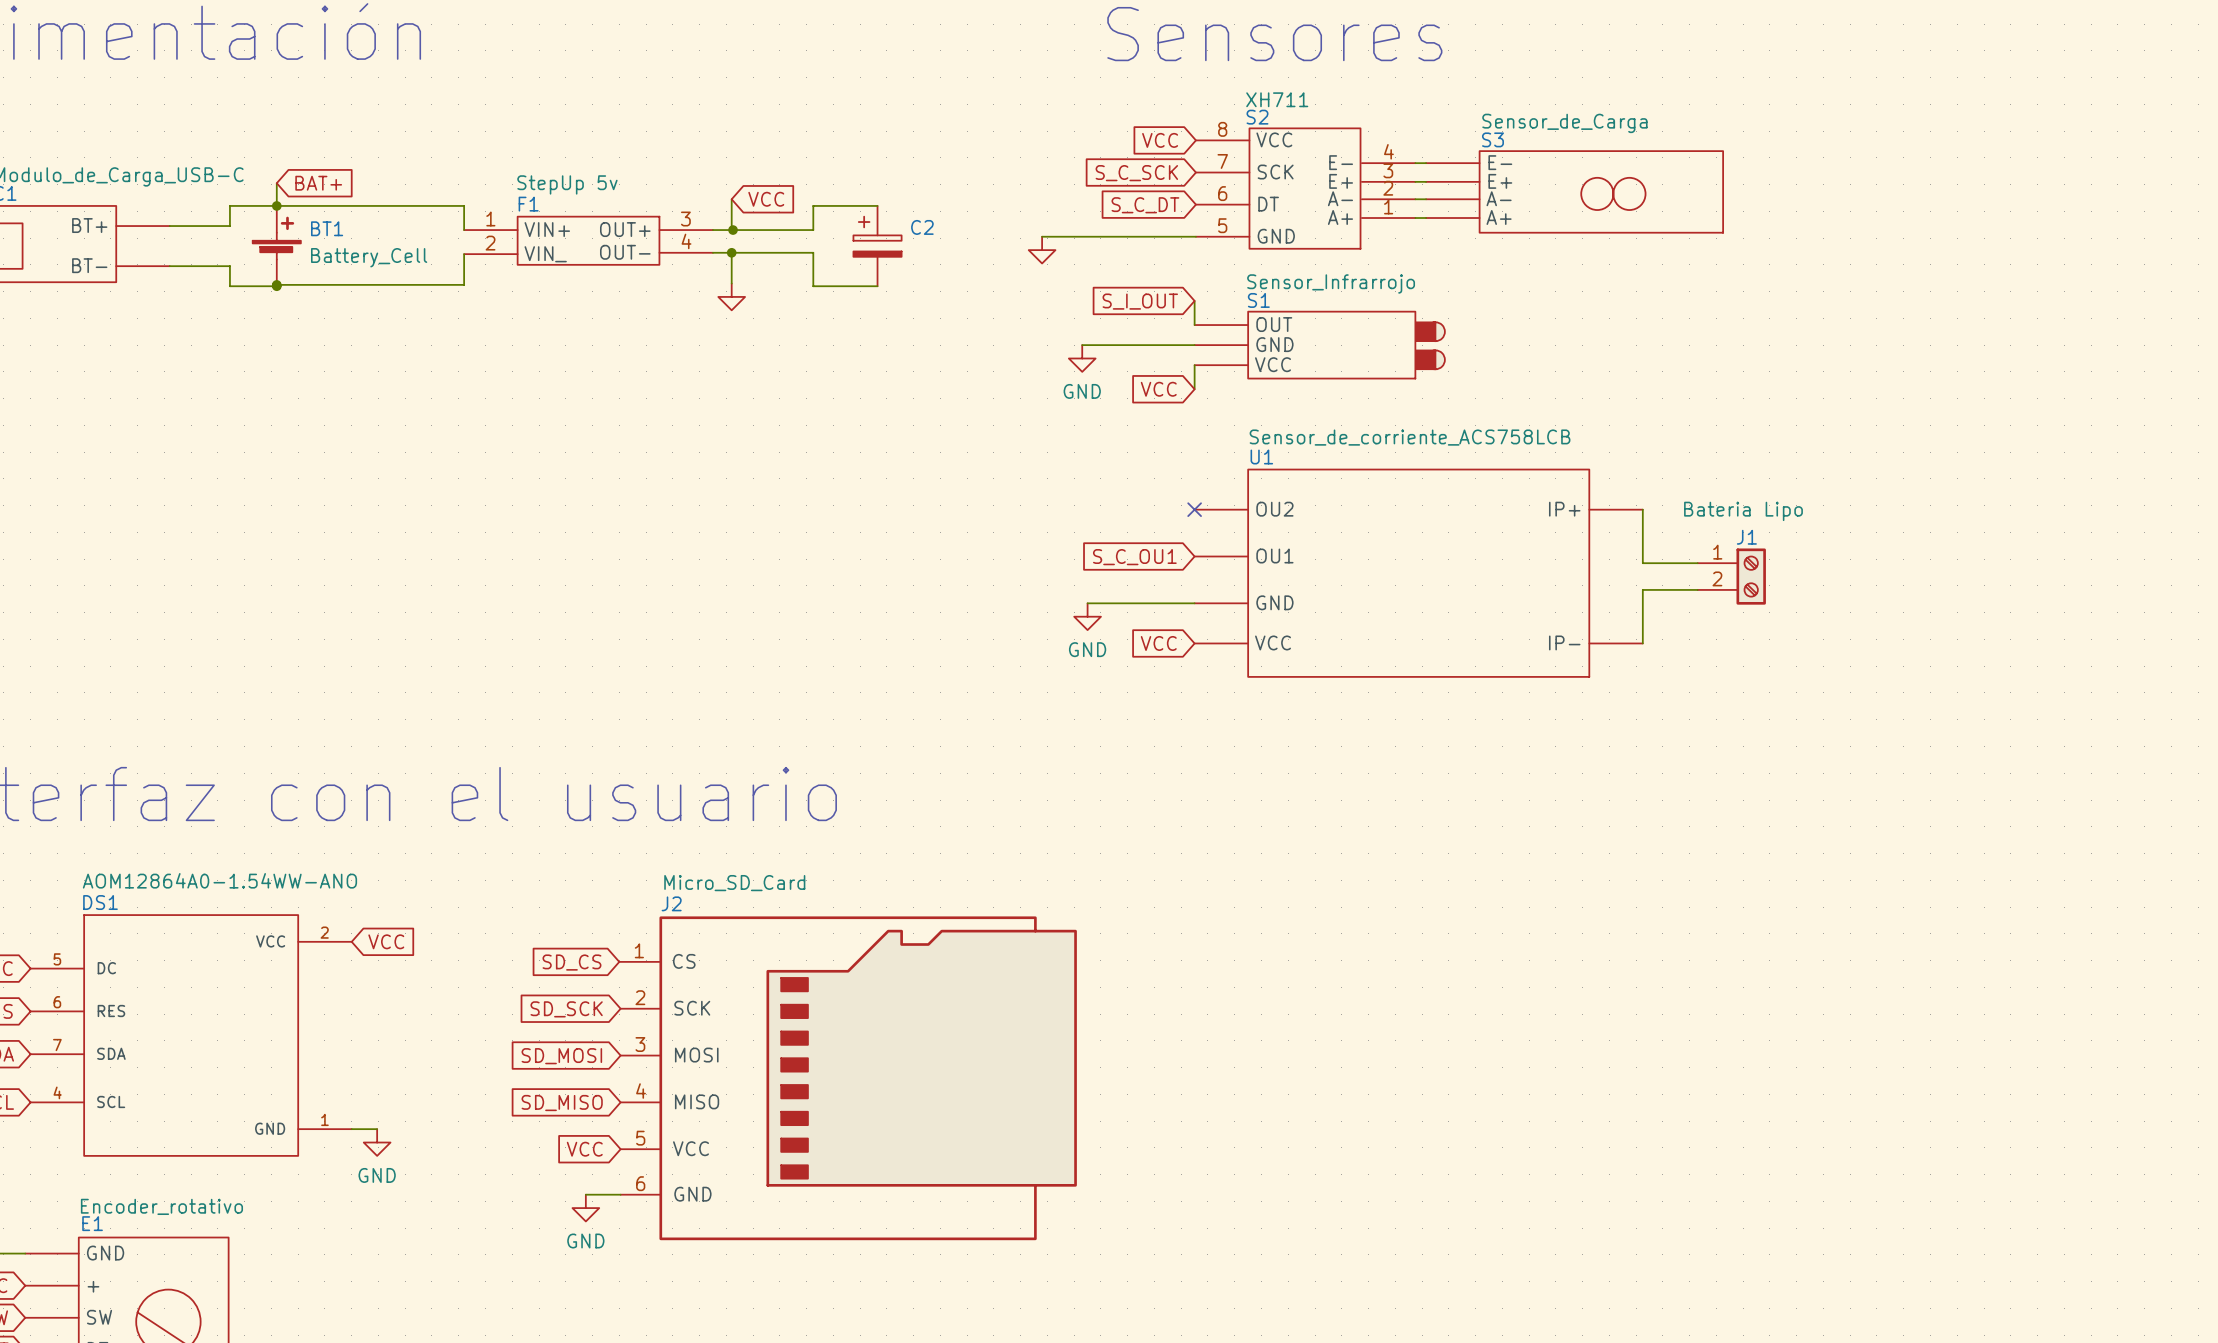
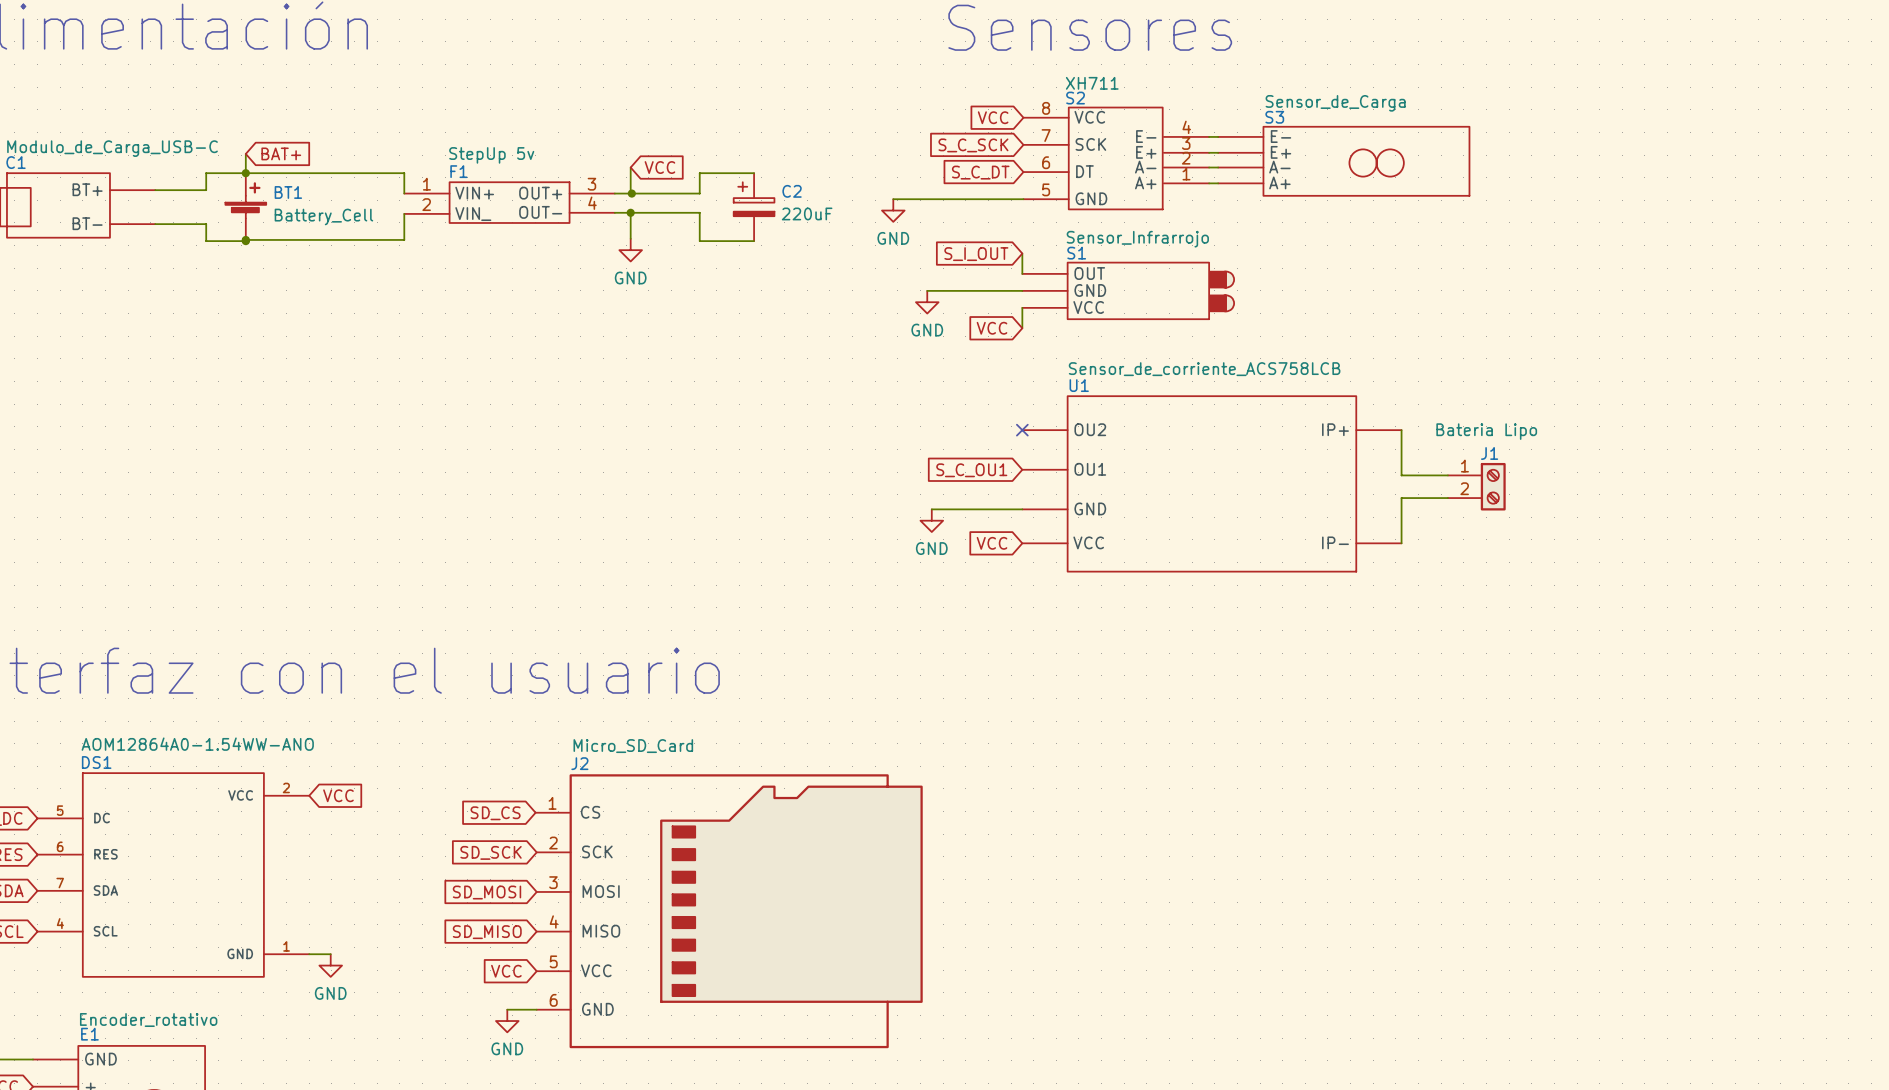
C2 value: none -> 220uF (807, 213)
power symbol text: none -> GND (893, 238)
power symbol text: none -> GND (630, 278)

